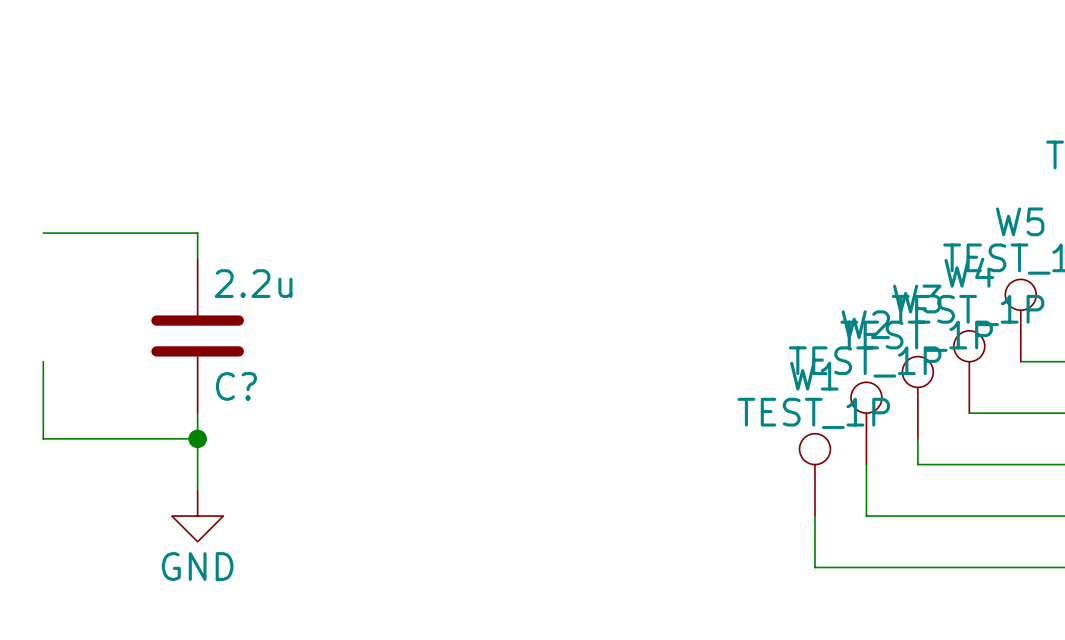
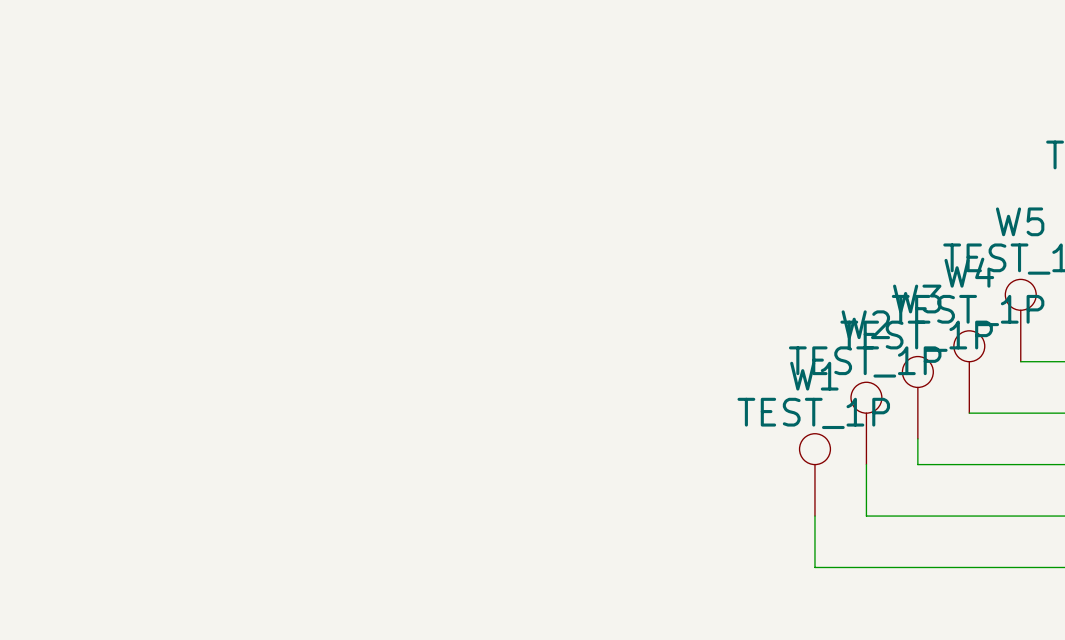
wire: (43, 233) (197, 233) (197, 258) -> none
C?: 2.2u (197, 335) -> none
wire: (43, 361) (43, 438) (197, 438) -> none
wire: (197, 413) (197, 490) -> none
junction: (197, 438) -> none
power symbol: GND (197, 516) -> none

